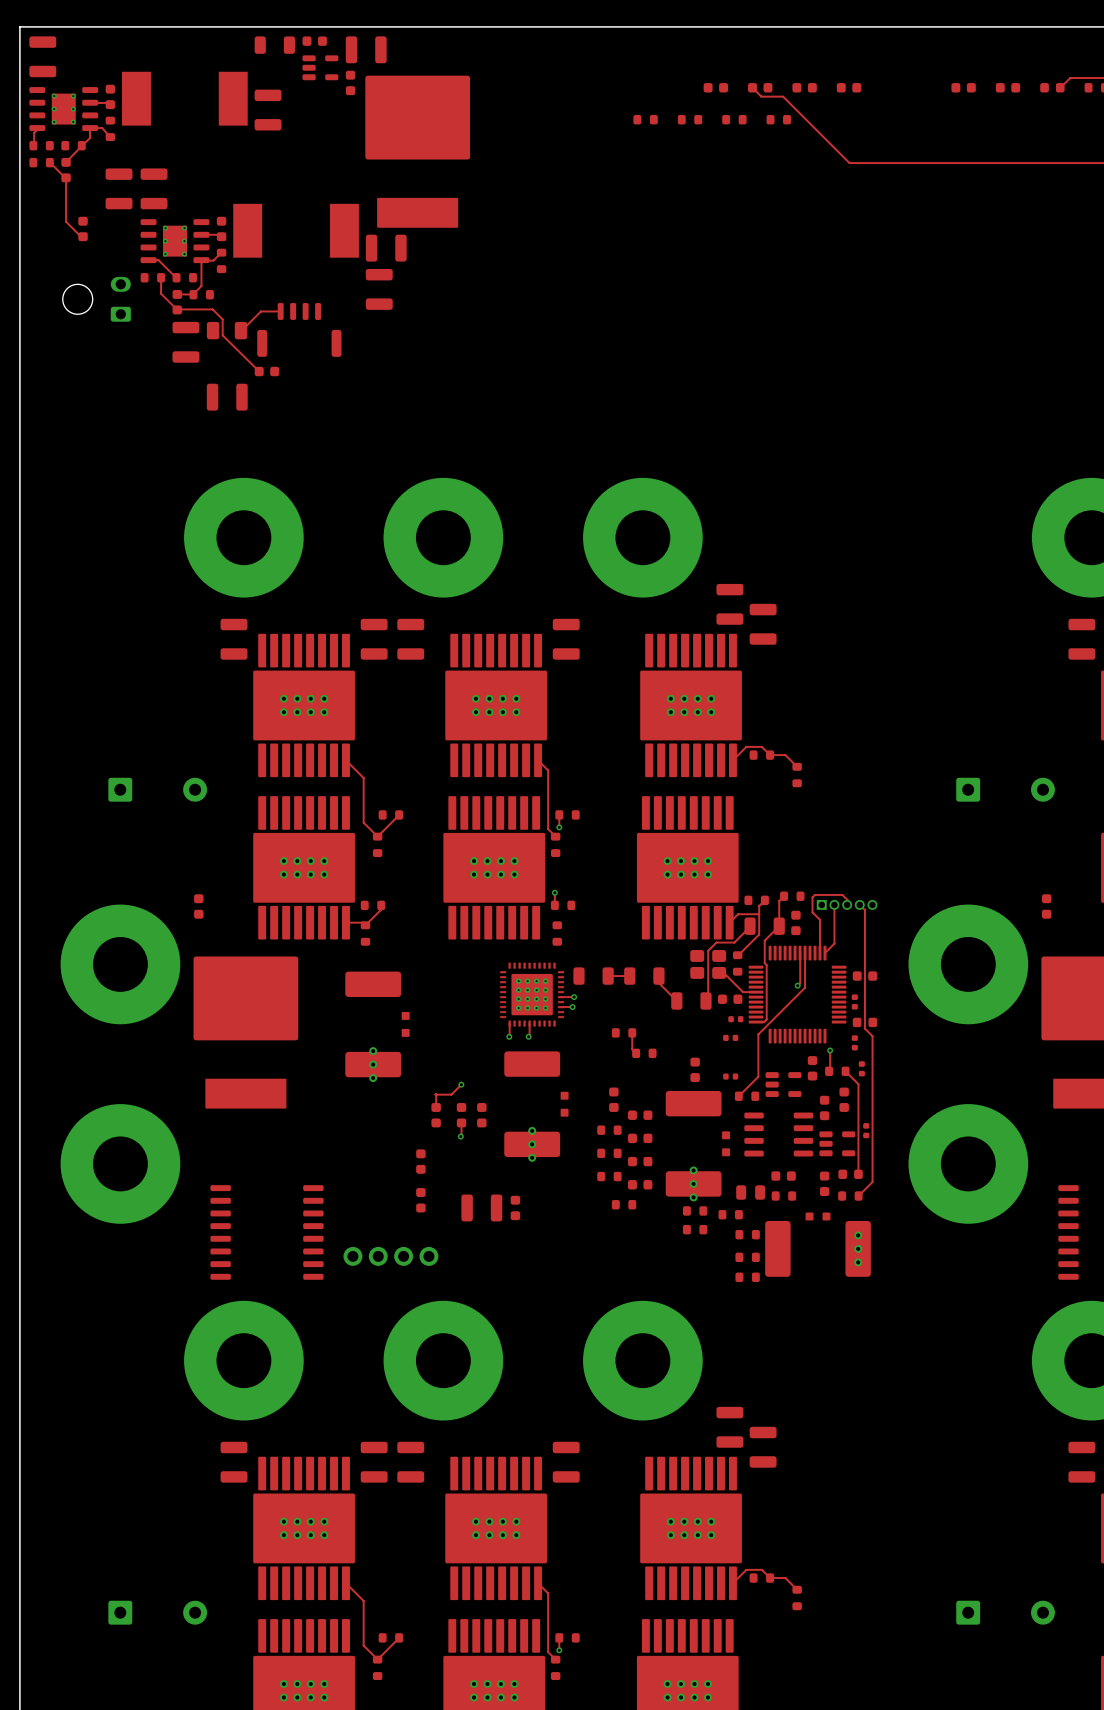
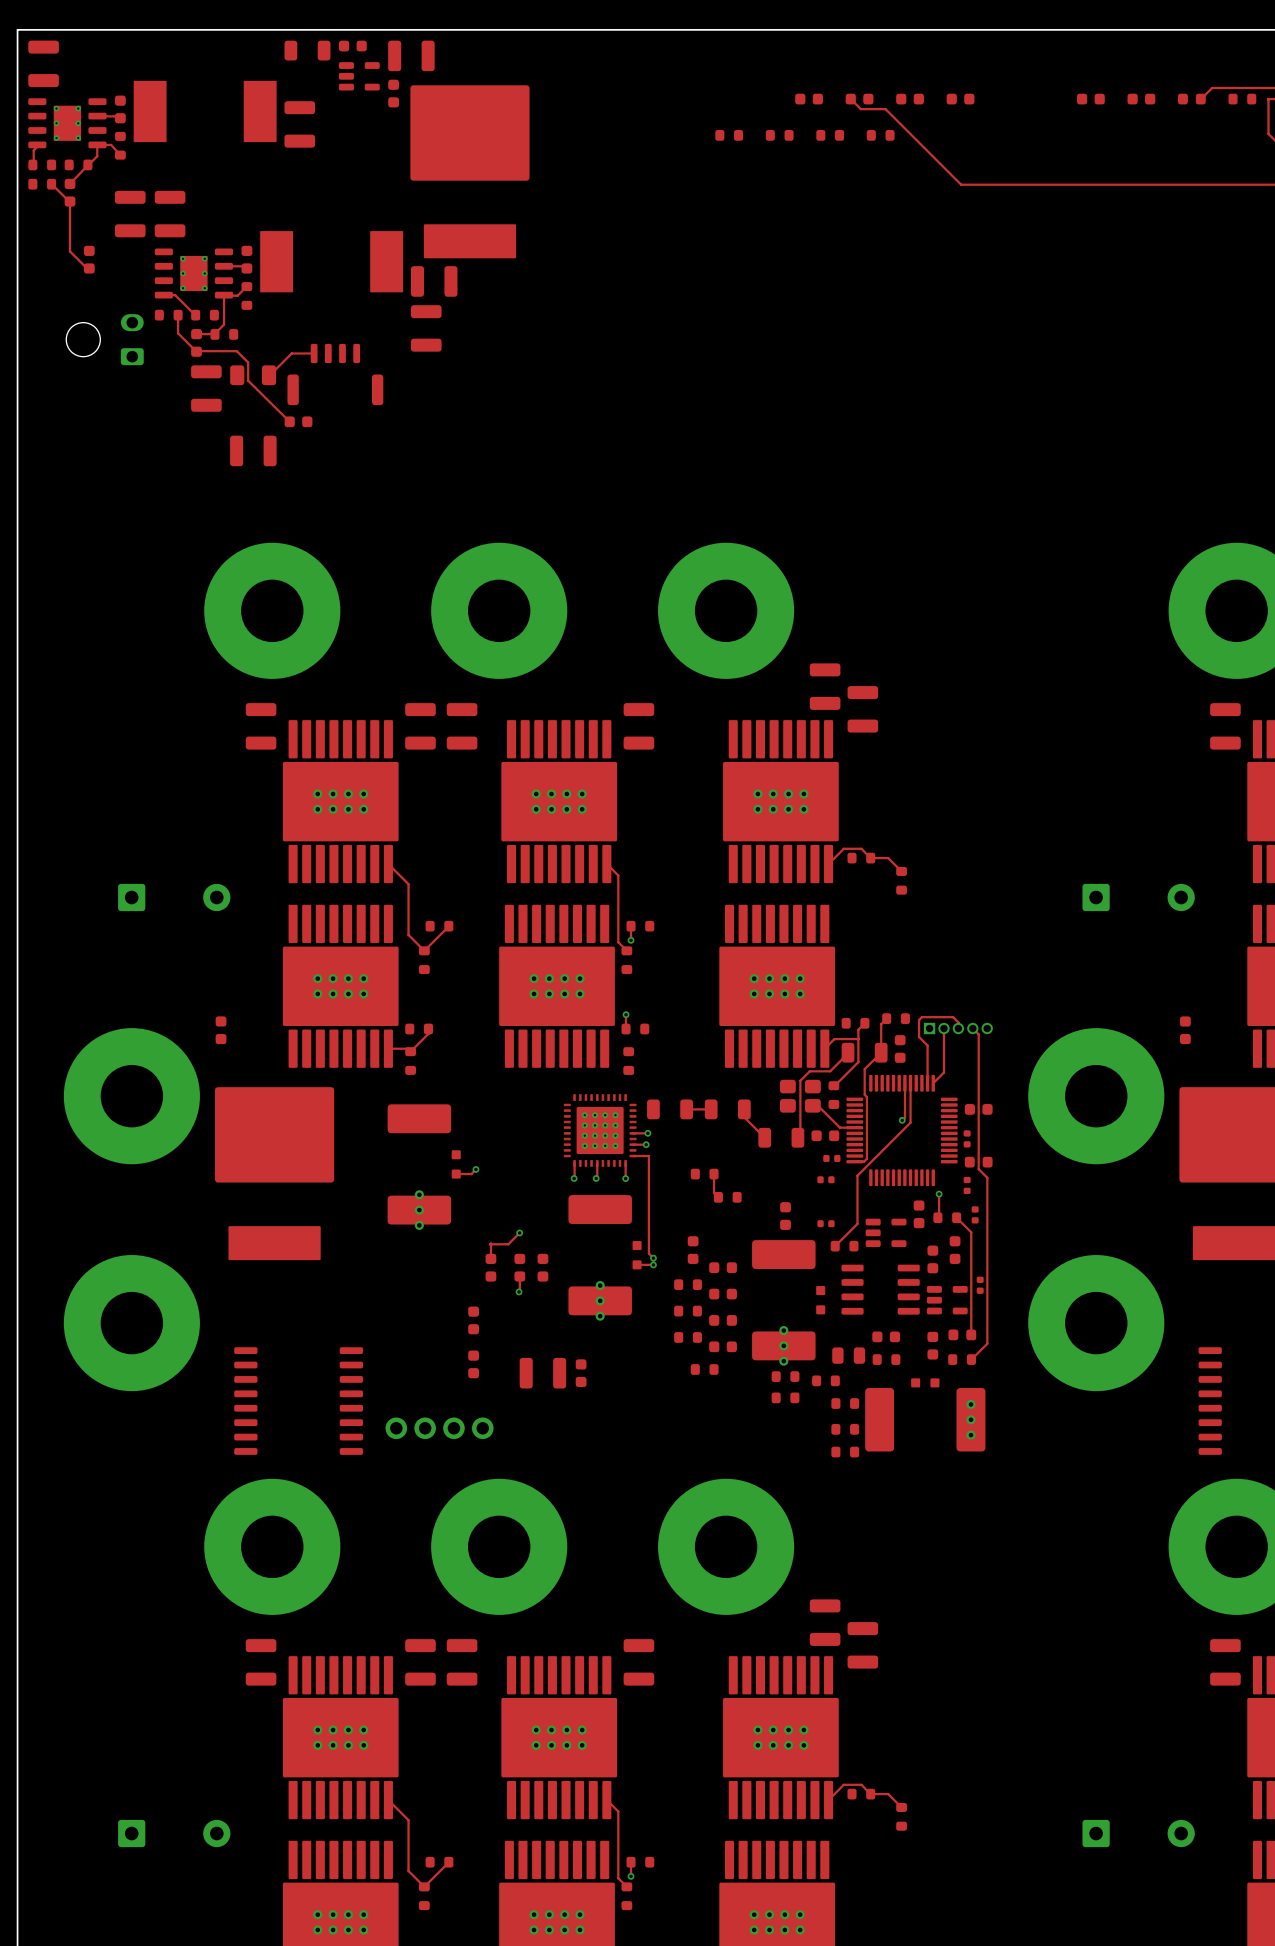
track: none -> (633, 1156) (648, 1156) (648, 1253) (653, 1258)
track: none -> (625, 1163) (625, 1178)
track: none -> (475, 1169) (471, 1174)
via: none -> (475, 1169)
track: none -> (456, 1174) (471, 1174)
via: none -> (625, 1178)
via: none -> (653, 1258)
track: none -> (637, 1264) (653, 1264)
via: none -> (653, 1264)

